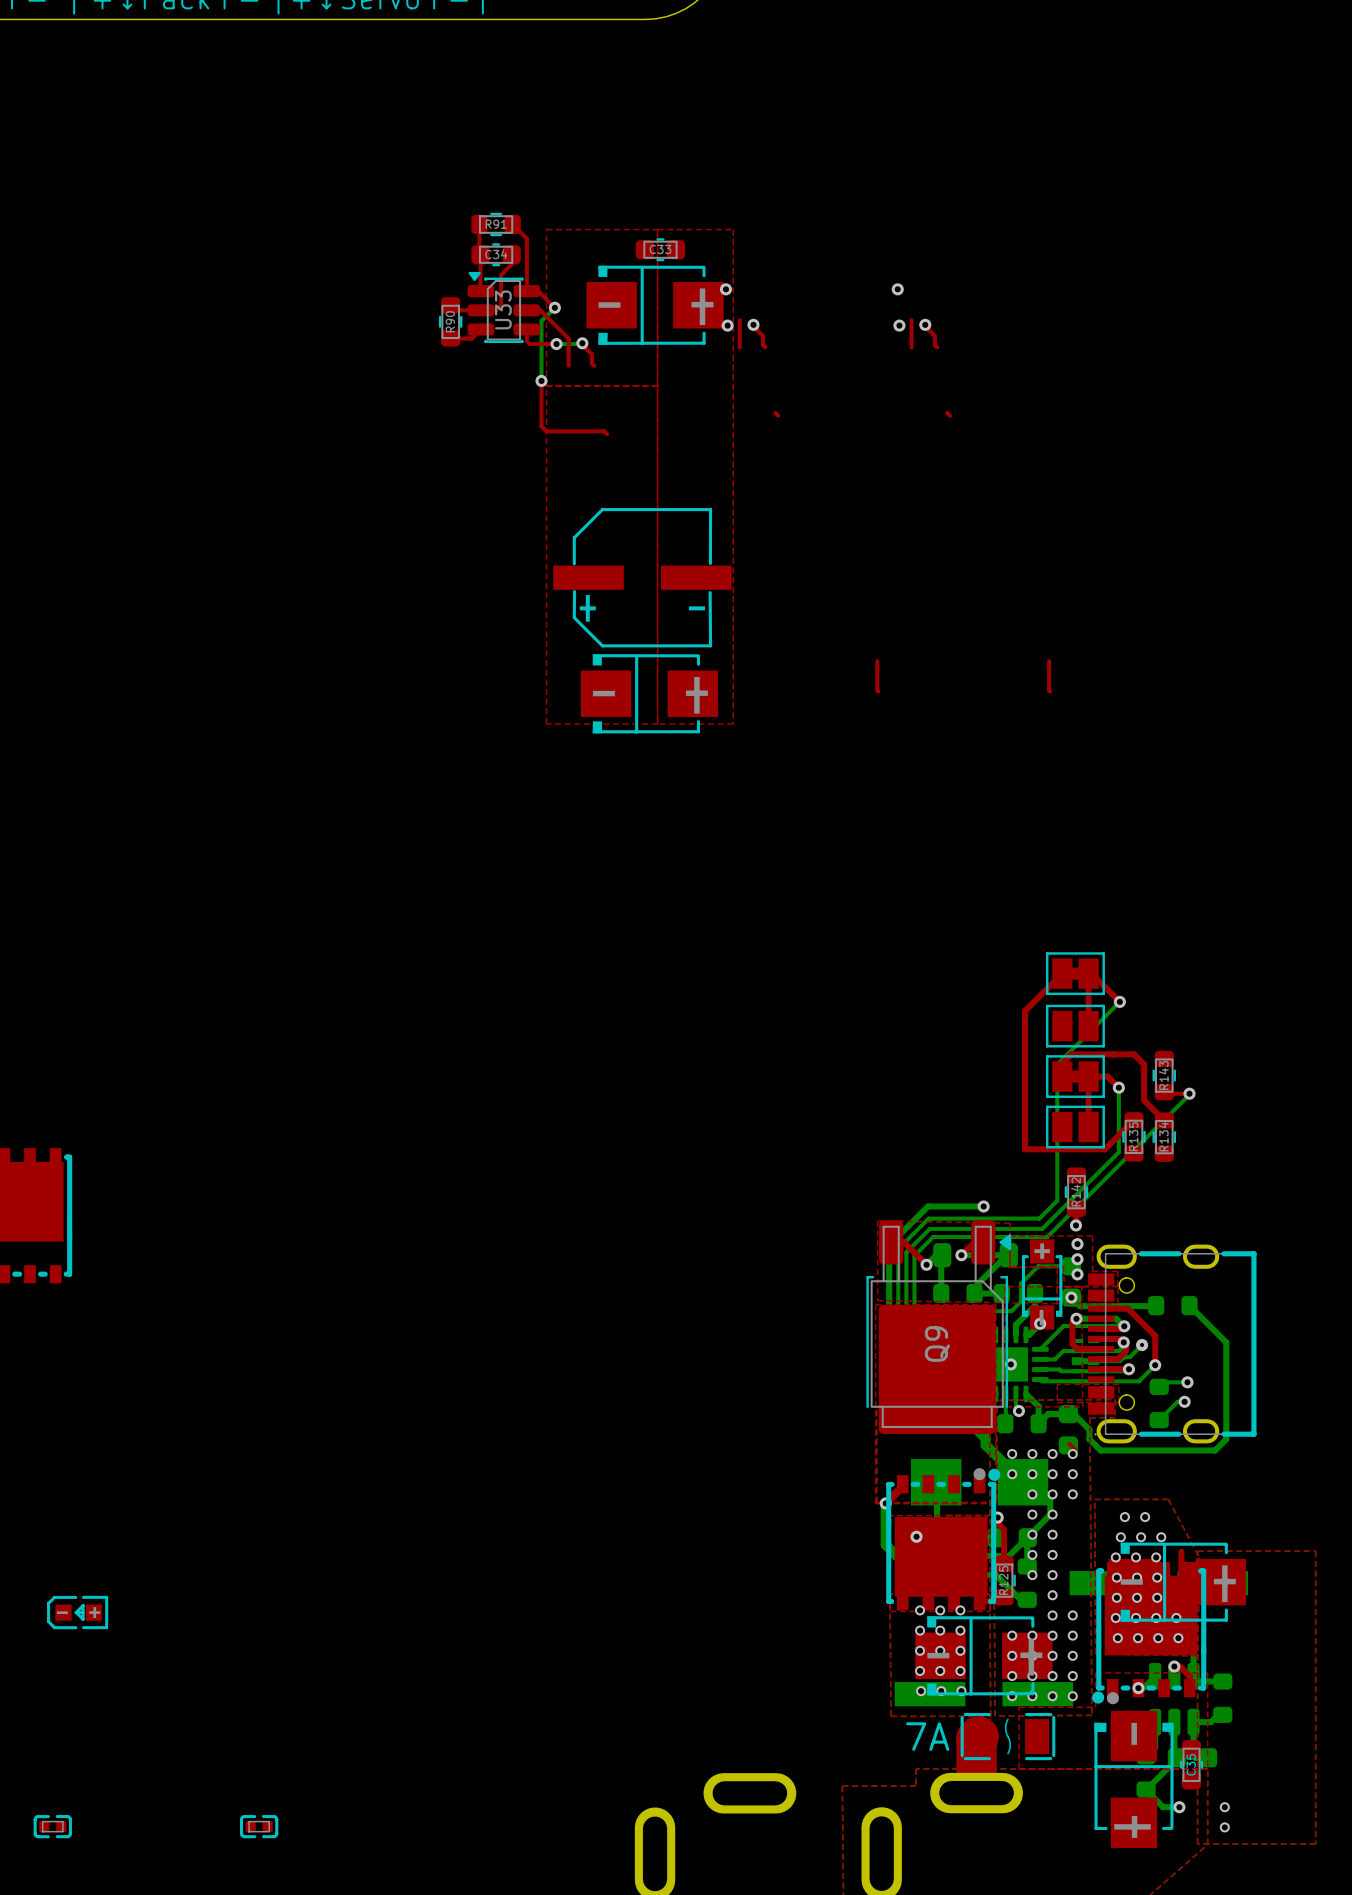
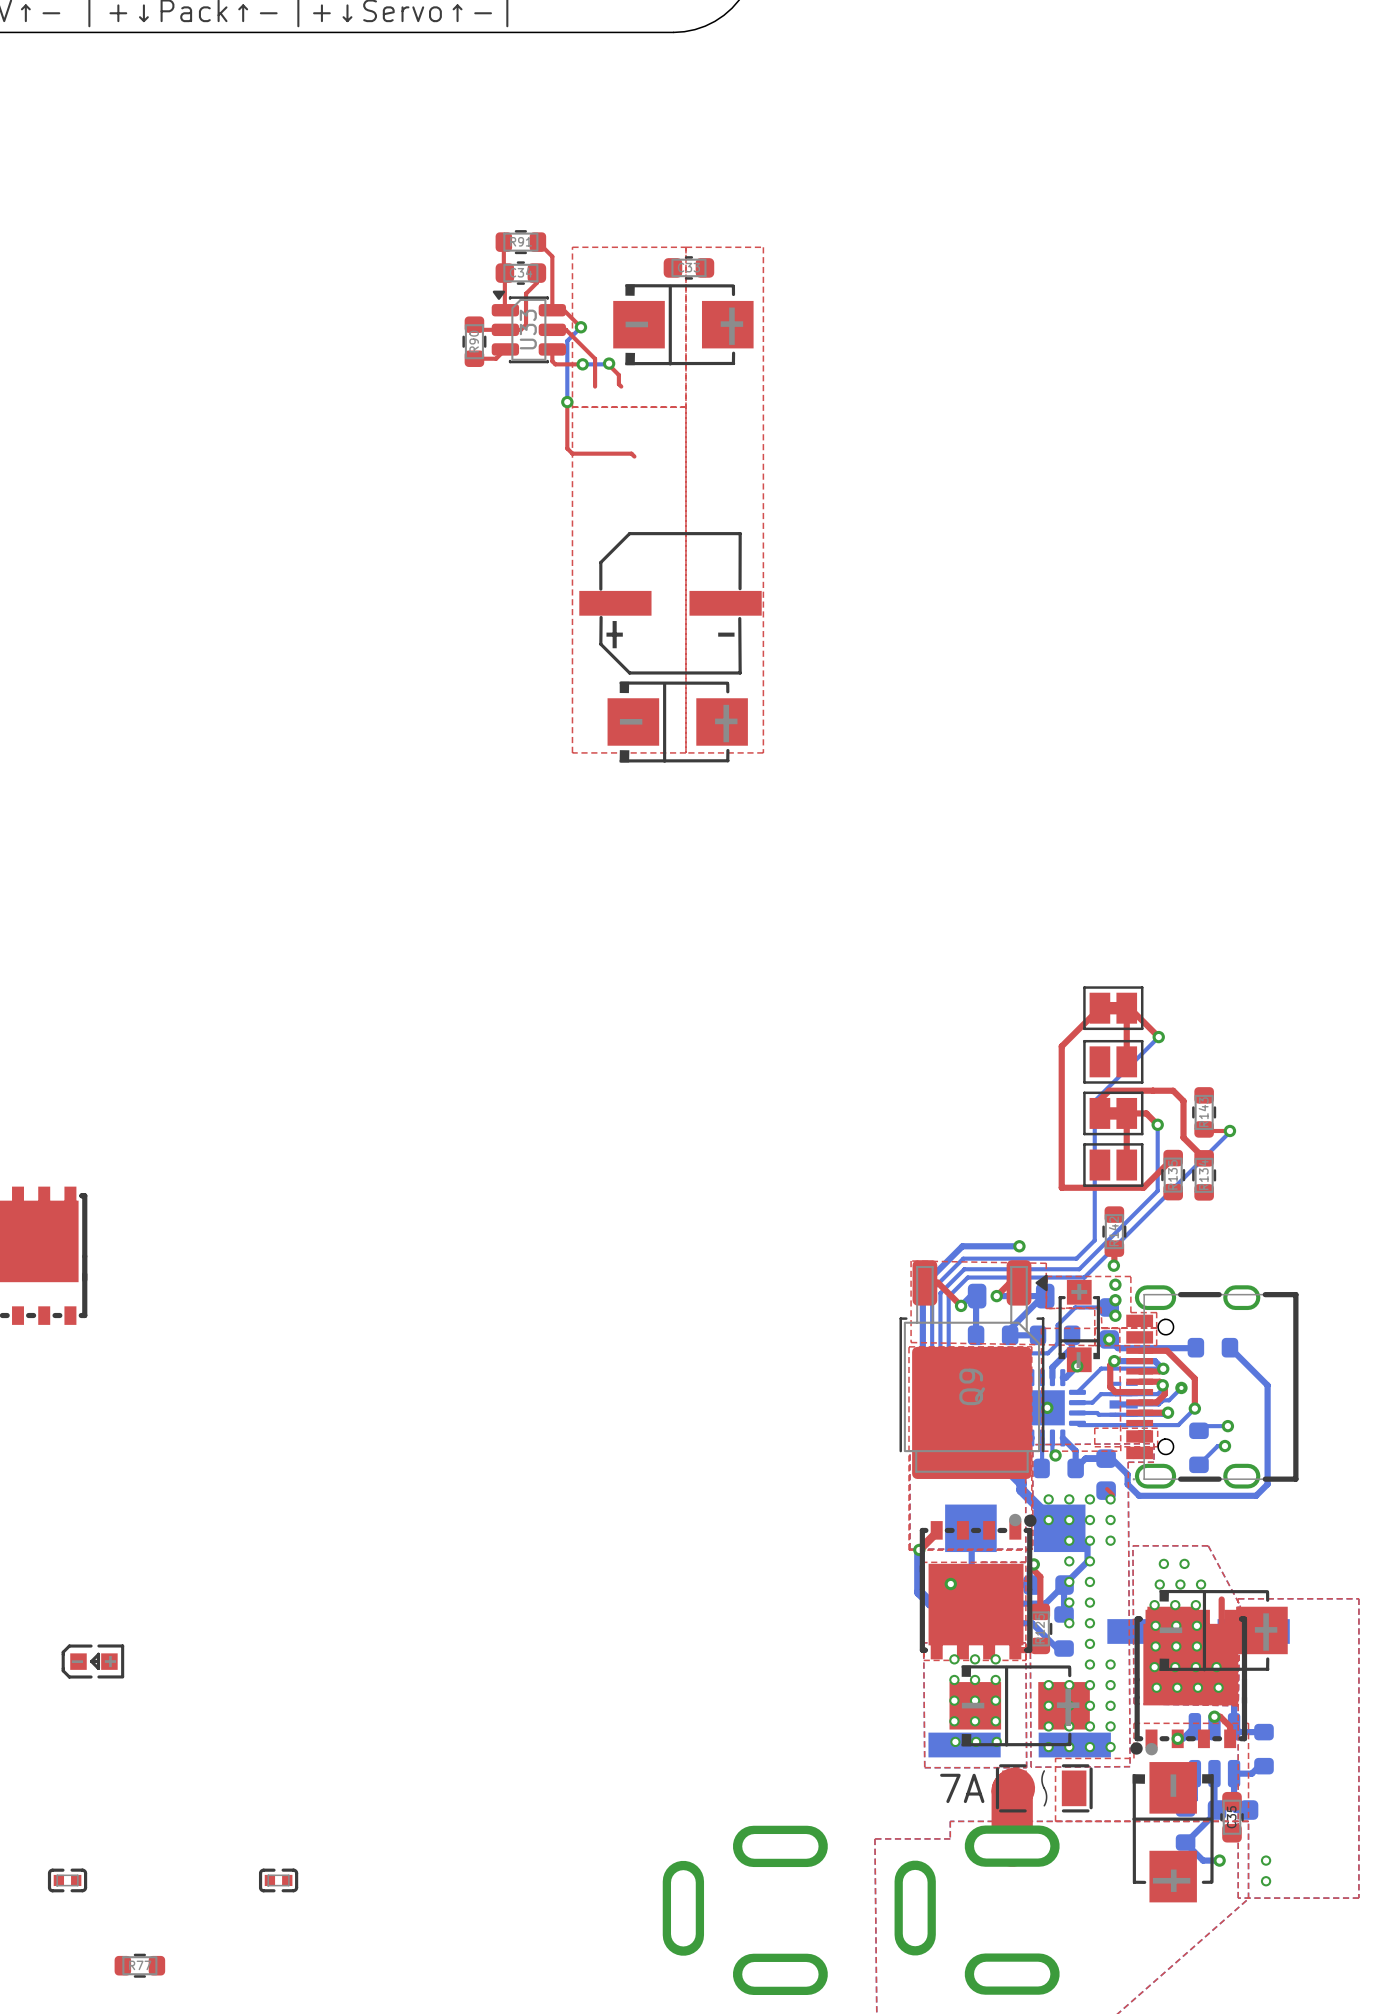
via: (725, 289) -> none
via: (897, 289) -> none
top track: (739, 320) (739, 347) -> none
top track: (911, 320) (911, 347) -> none
top track: (753, 324) (763, 336) (763, 345) (765, 347) -> none
via: (753, 324) -> none
top track: (925, 324) (934, 336) (934, 345) (937, 347) -> none
via: (925, 324) -> none
via: (727, 325) -> none
via: (899, 325) -> none
top track: (775, 412) (778, 415) -> none
top track: (947, 412) (950, 415) -> none
top track: (877, 661) (878, 691) -> none
top track: (1049, 661) (1050, 691) -> none

